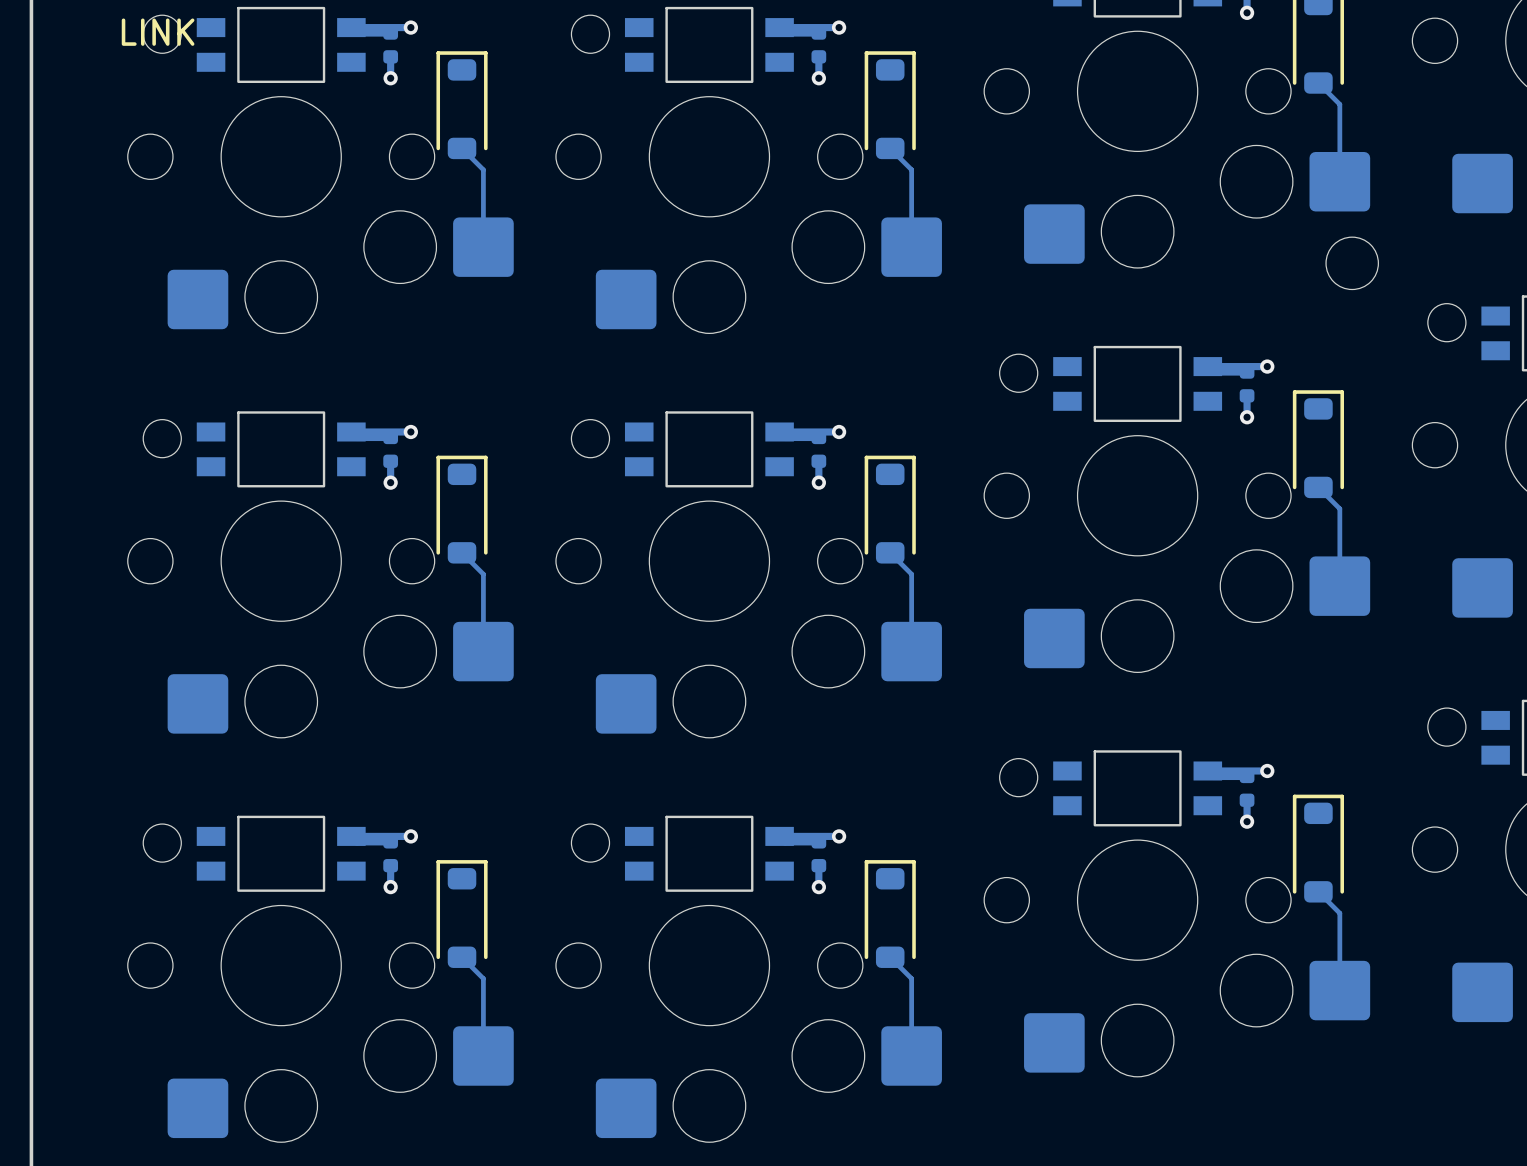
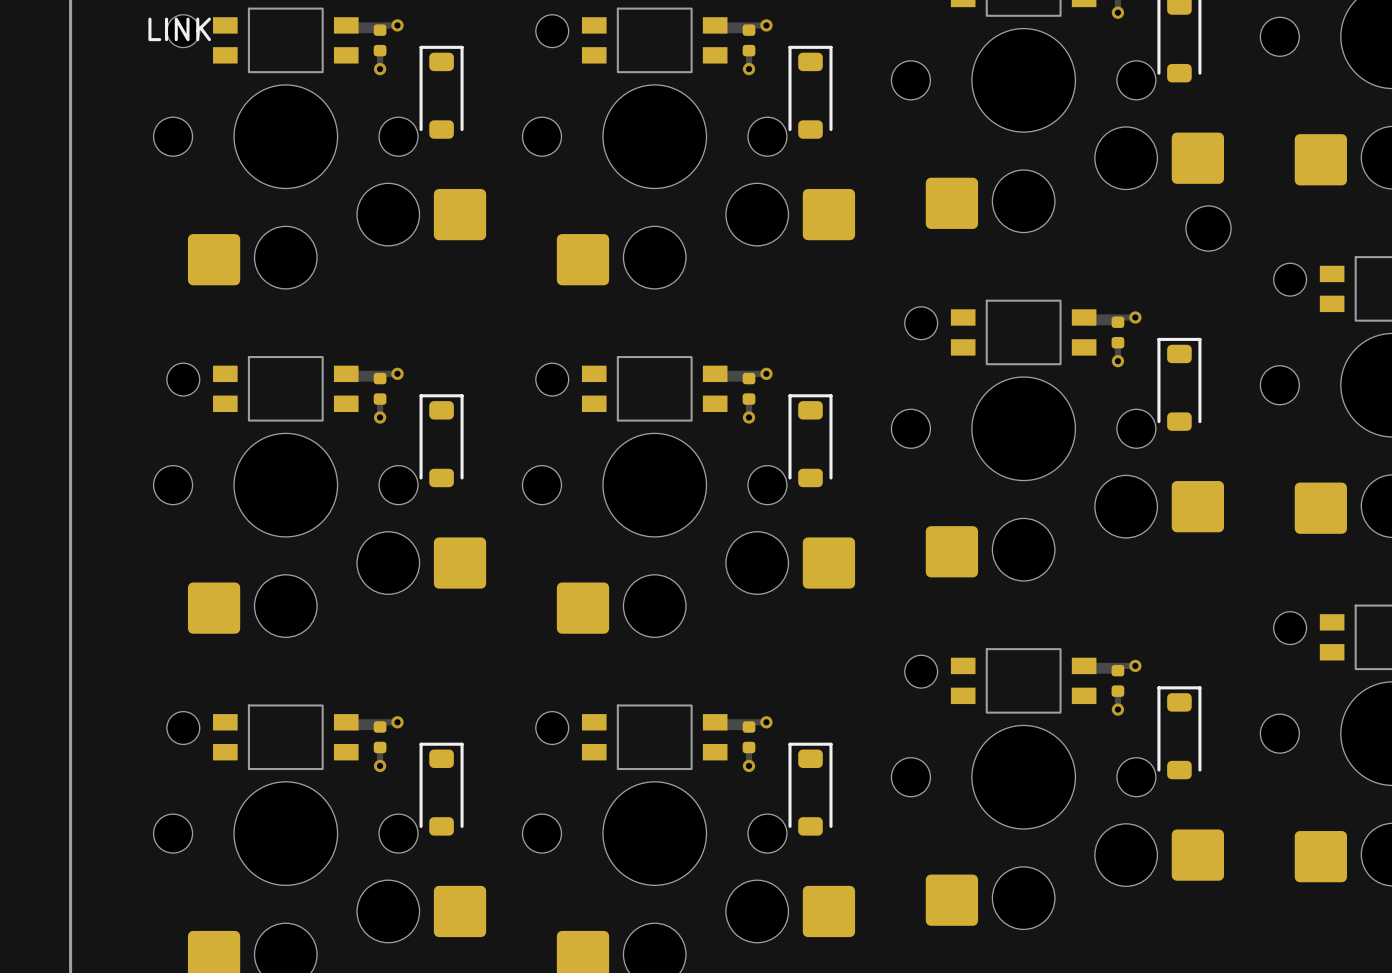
track: (1318, 83) (1339, 104) (1339, 181) -> none
track: (462, 148) (483, 169) (483, 247) -> none
track: (890, 148) (911, 169) (911, 247) -> none
track: (1318, 487) (1339, 508) (1339, 586) -> none
track: (462, 552) (483, 574) (483, 651) -> none
track: (890, 552) (911, 574) (911, 651) -> none
track: (1318, 891) (1339, 913) (1339, 990) -> none
track: (462, 957) (483, 978) (483, 1055) -> none
track: (890, 957) (911, 978) (911, 1055) -> none

